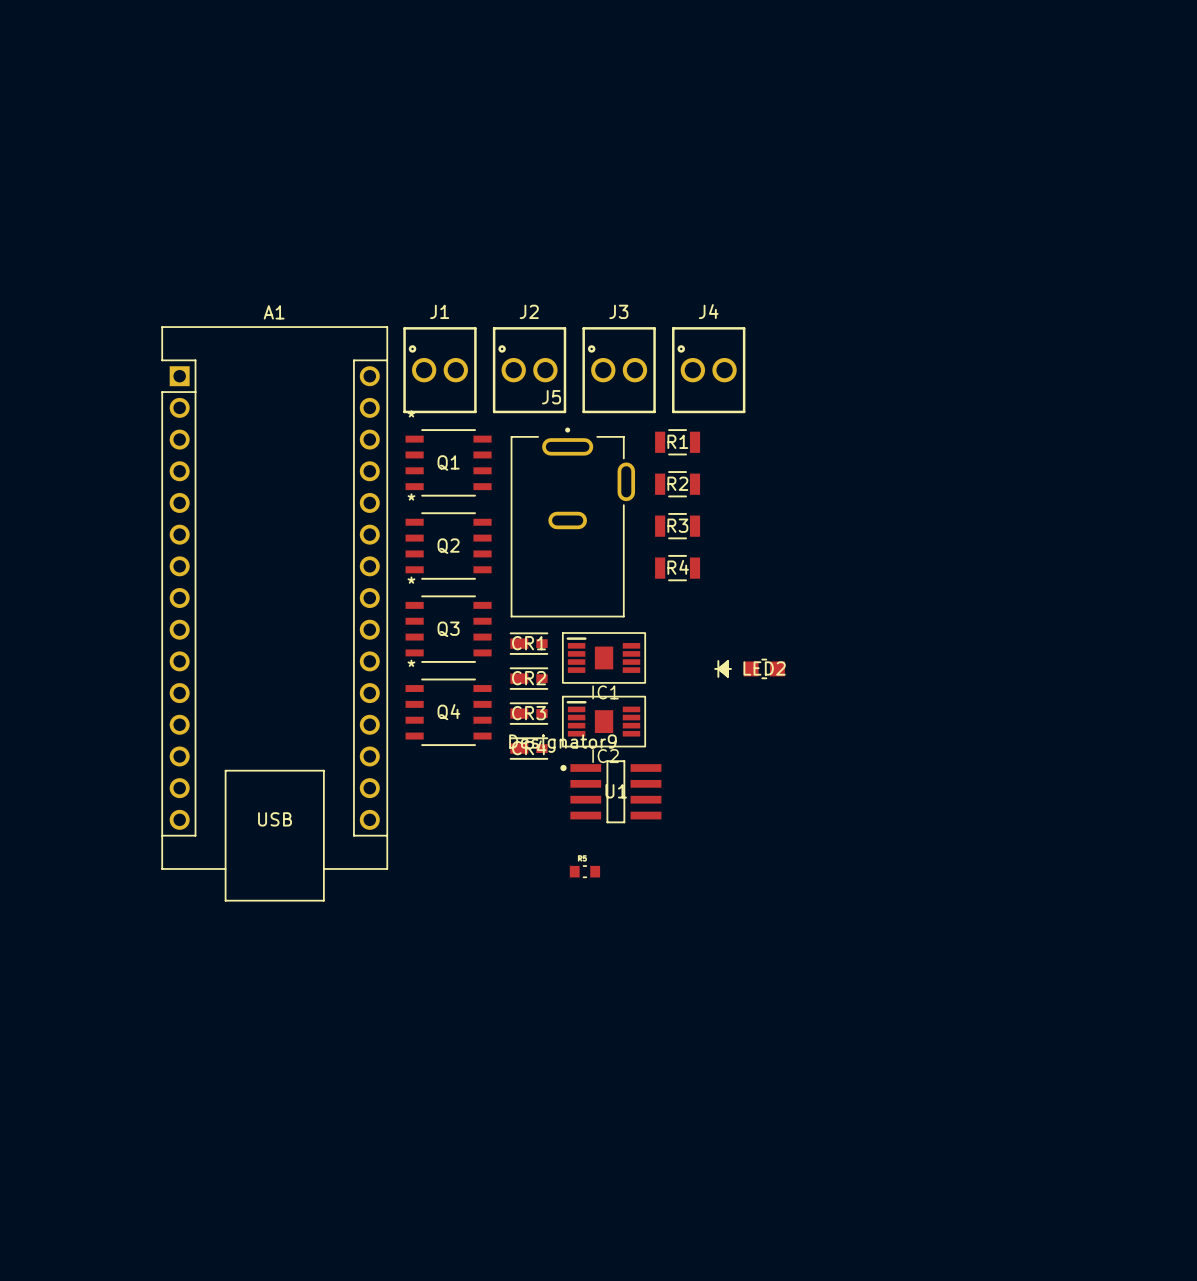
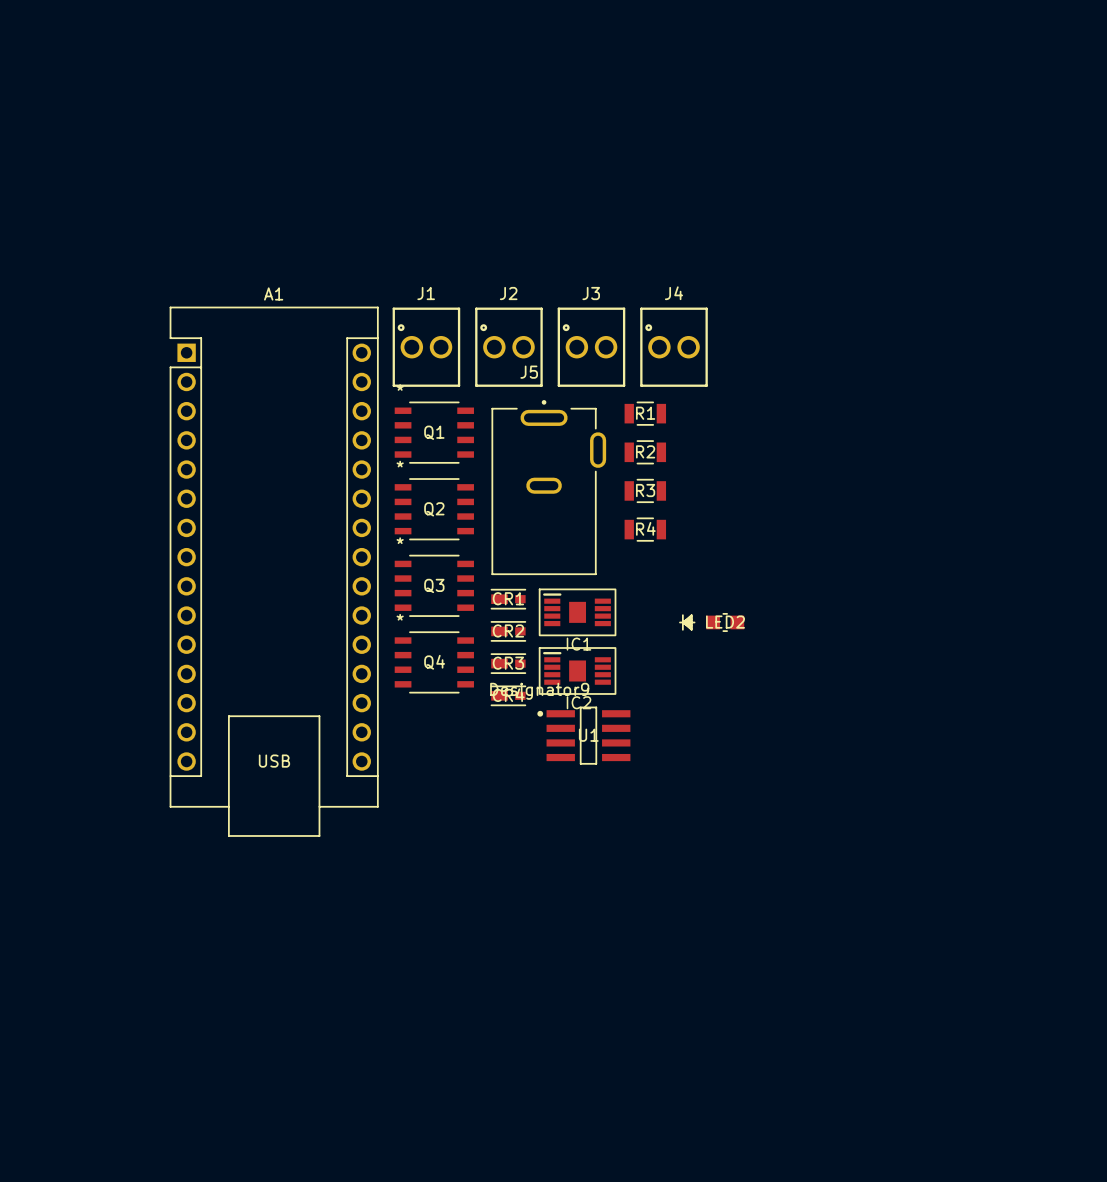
part: (584, 871) -> none

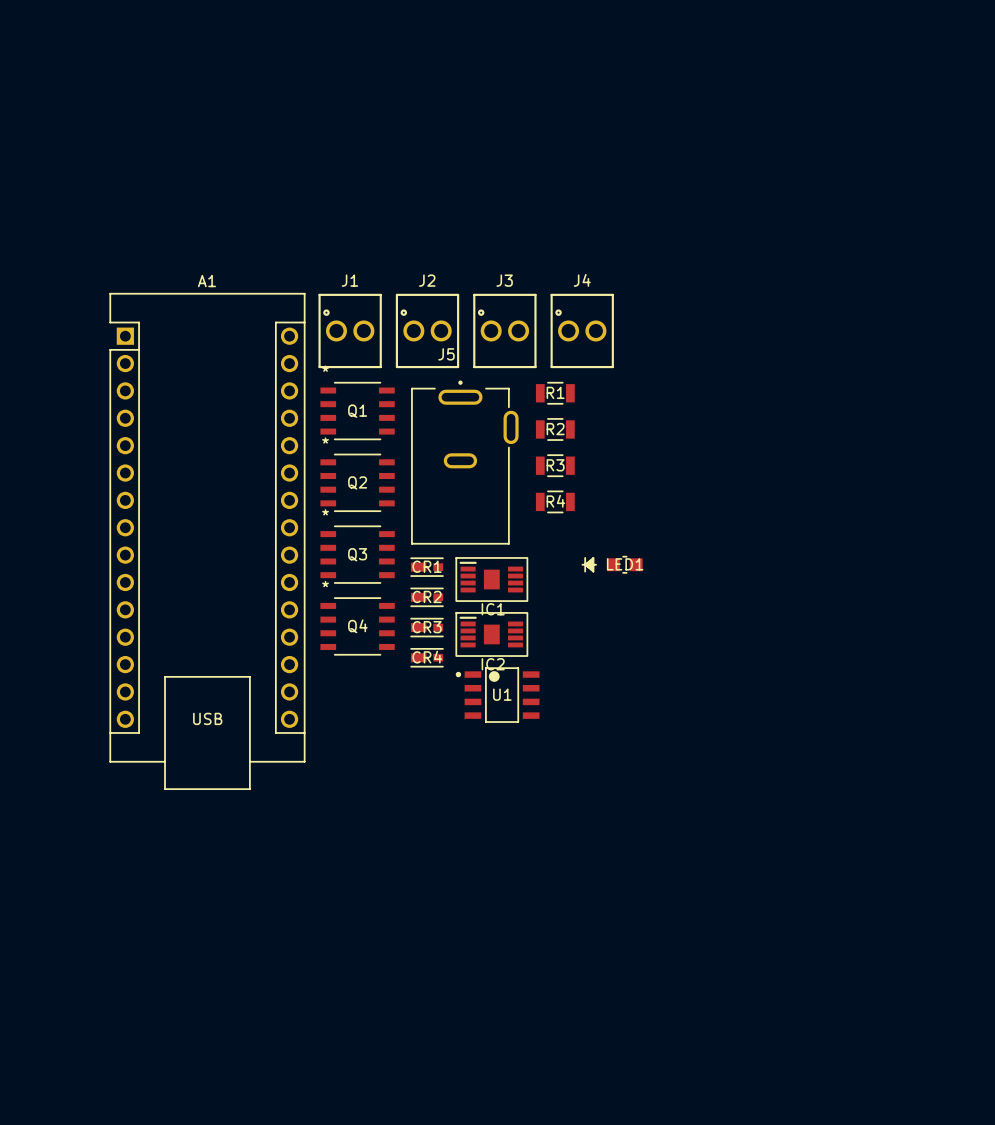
LED1: none -> (612, 564)
LED2: (711, 622) -> none
U1 footprint: [537, 706, 631, 765] -> [455, 667, 540, 723]

